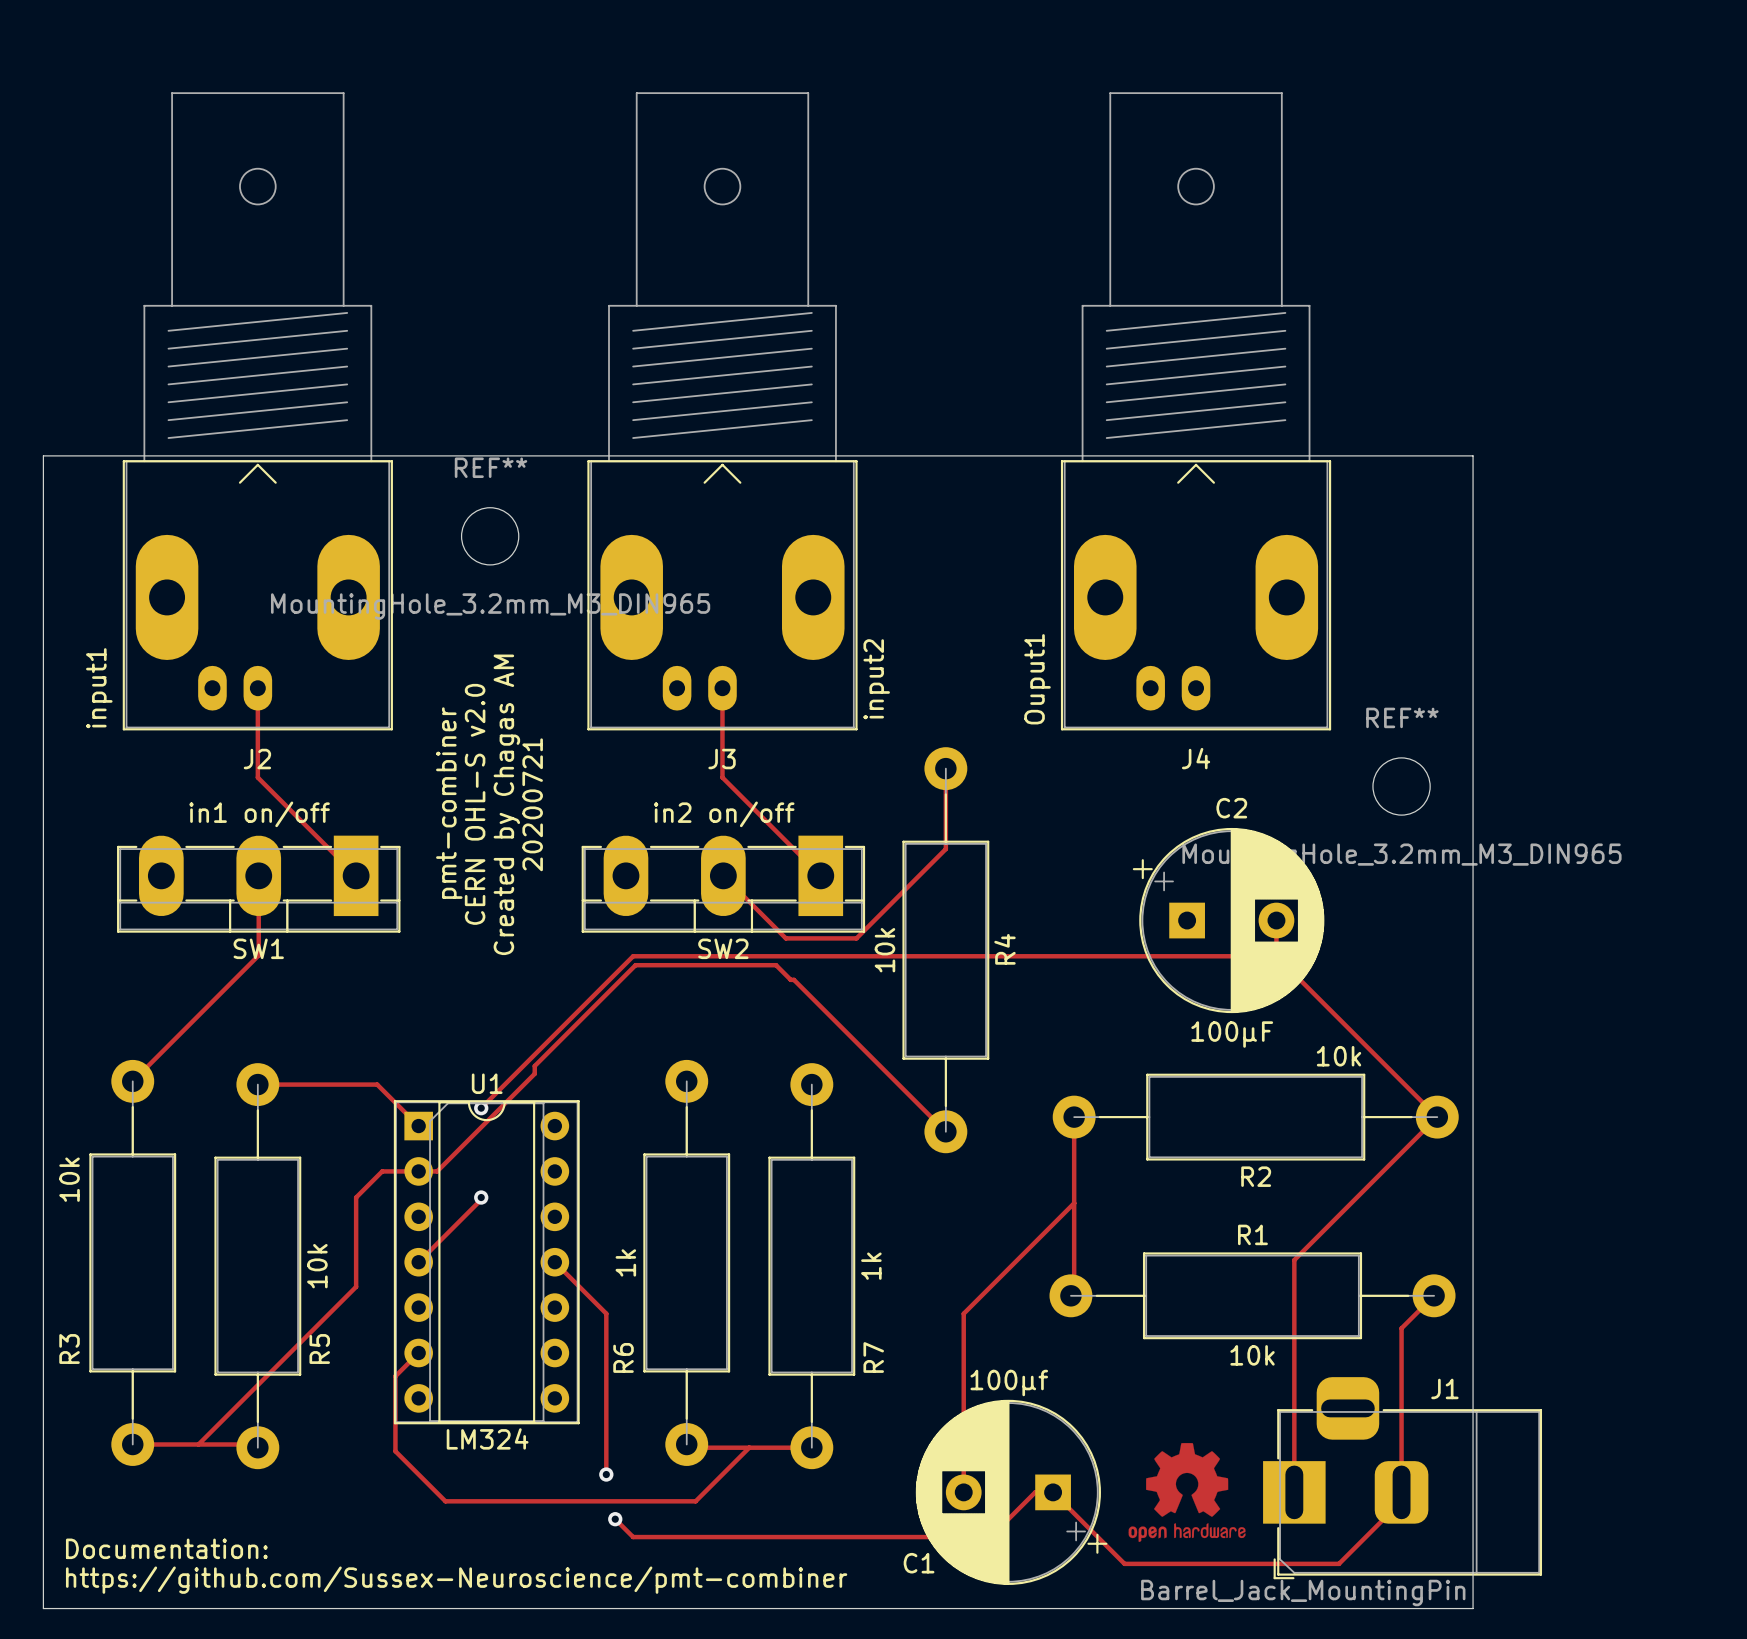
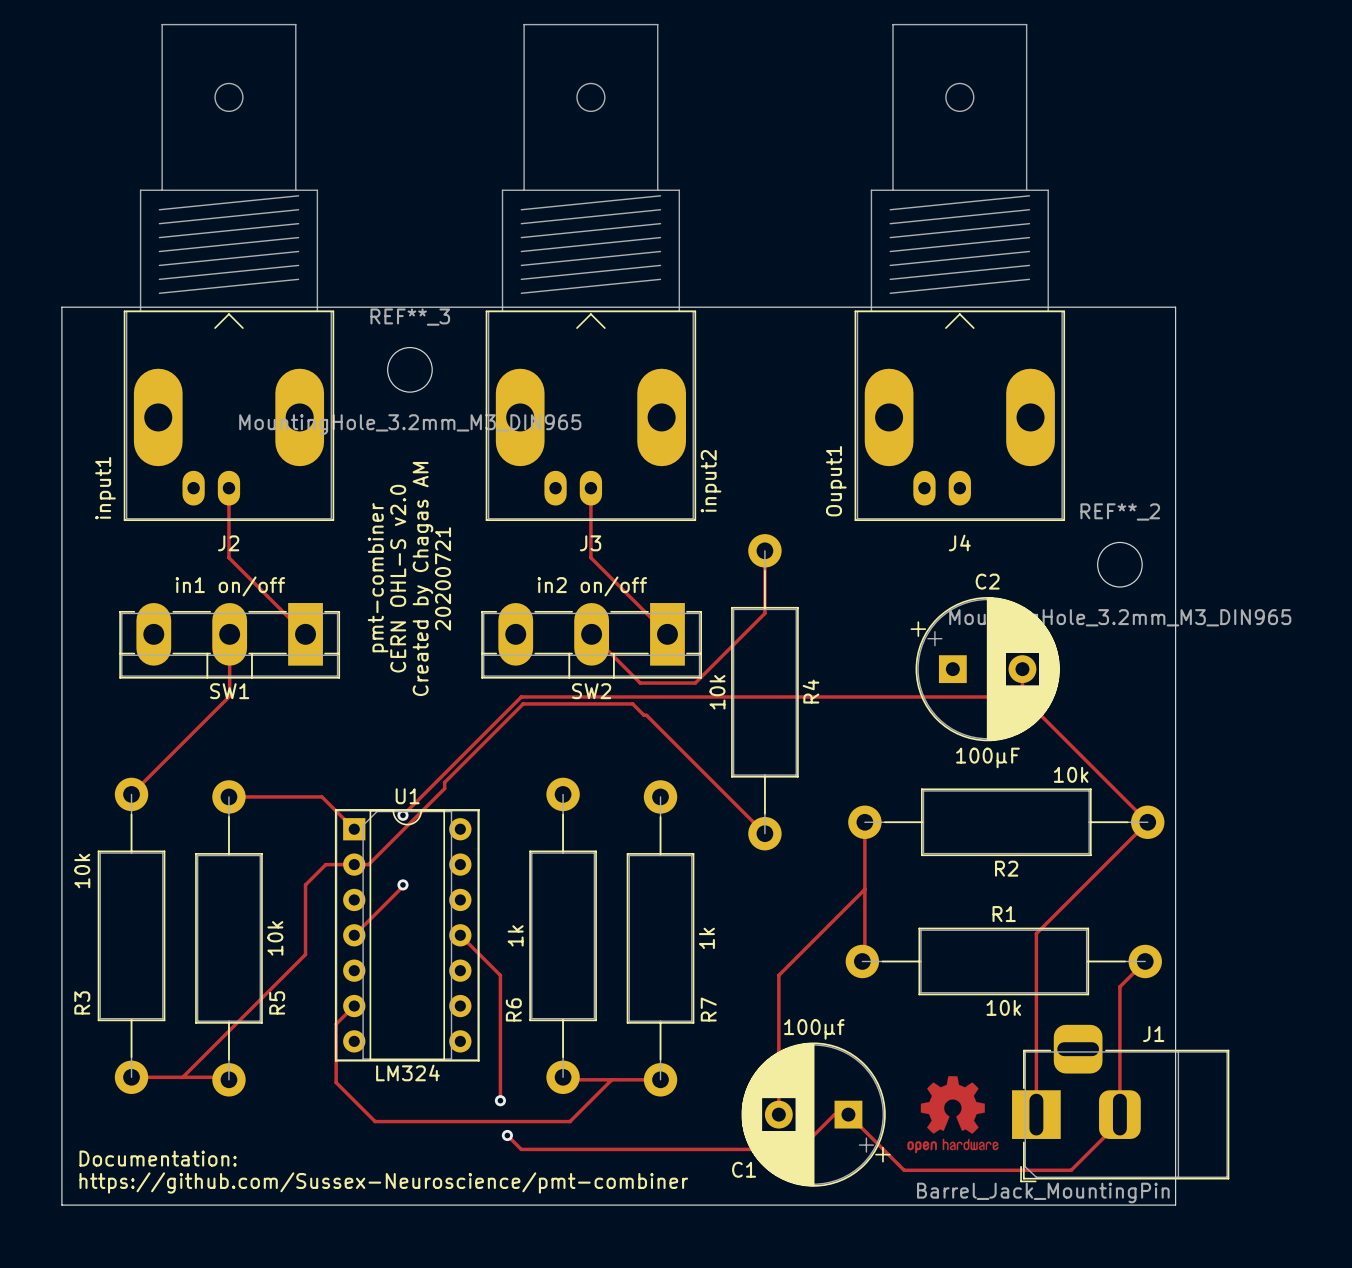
REF** name: REF** (491, 467) -> REF**_3 (410, 317)
REF** name: REF** (1402, 717) -> REF**_2 (1120, 511)

